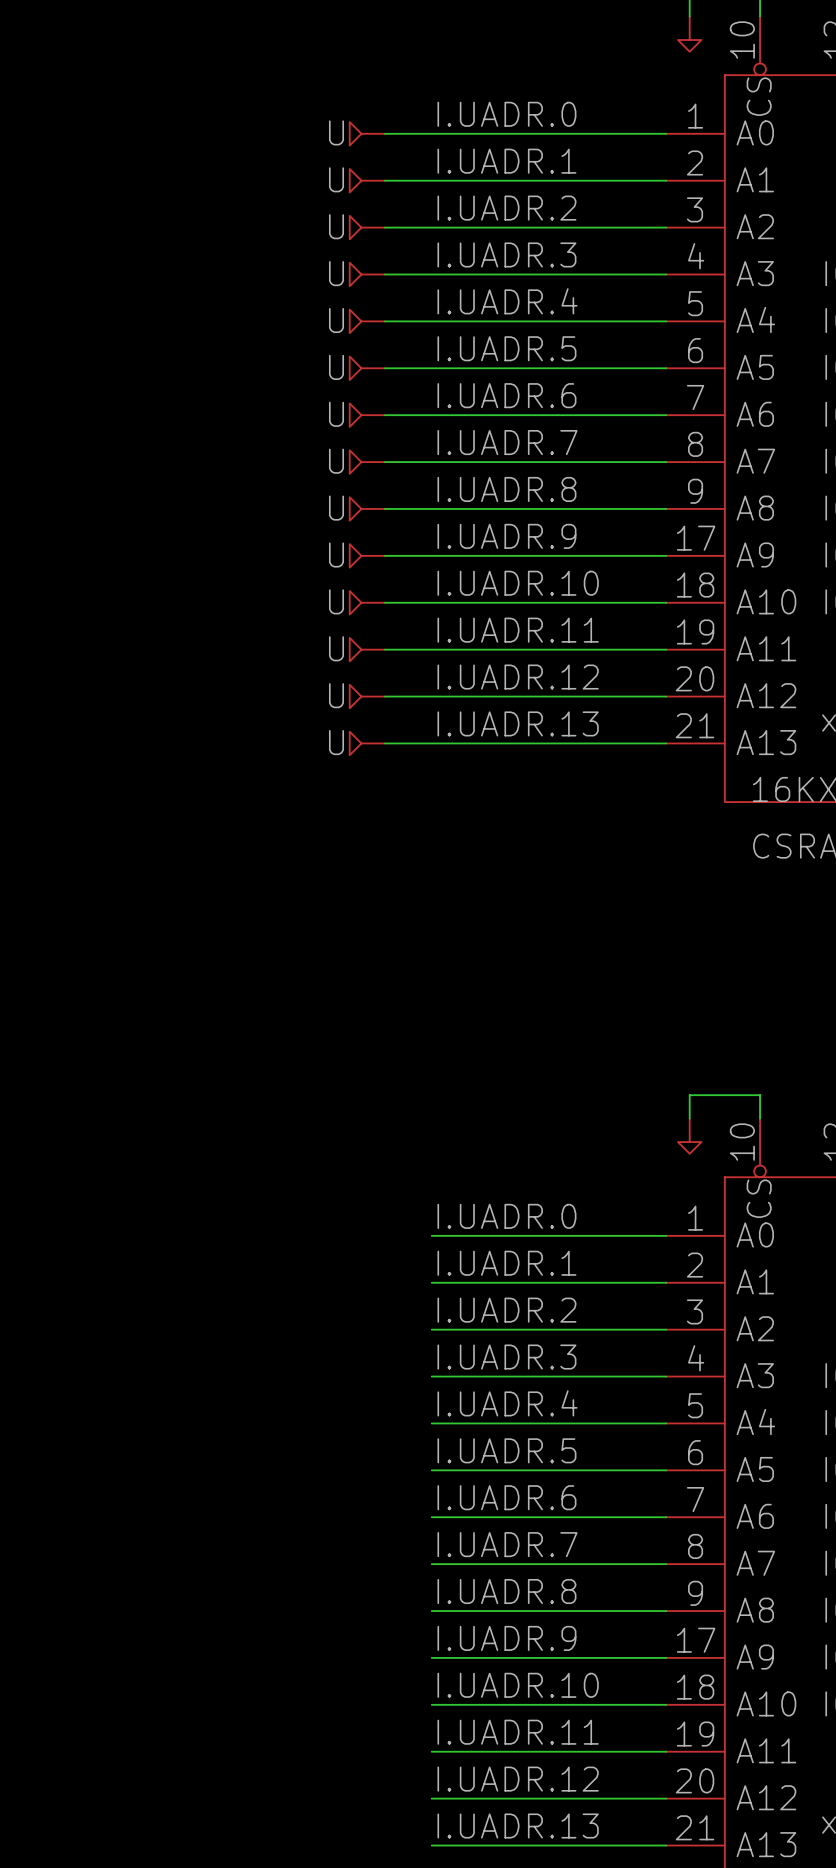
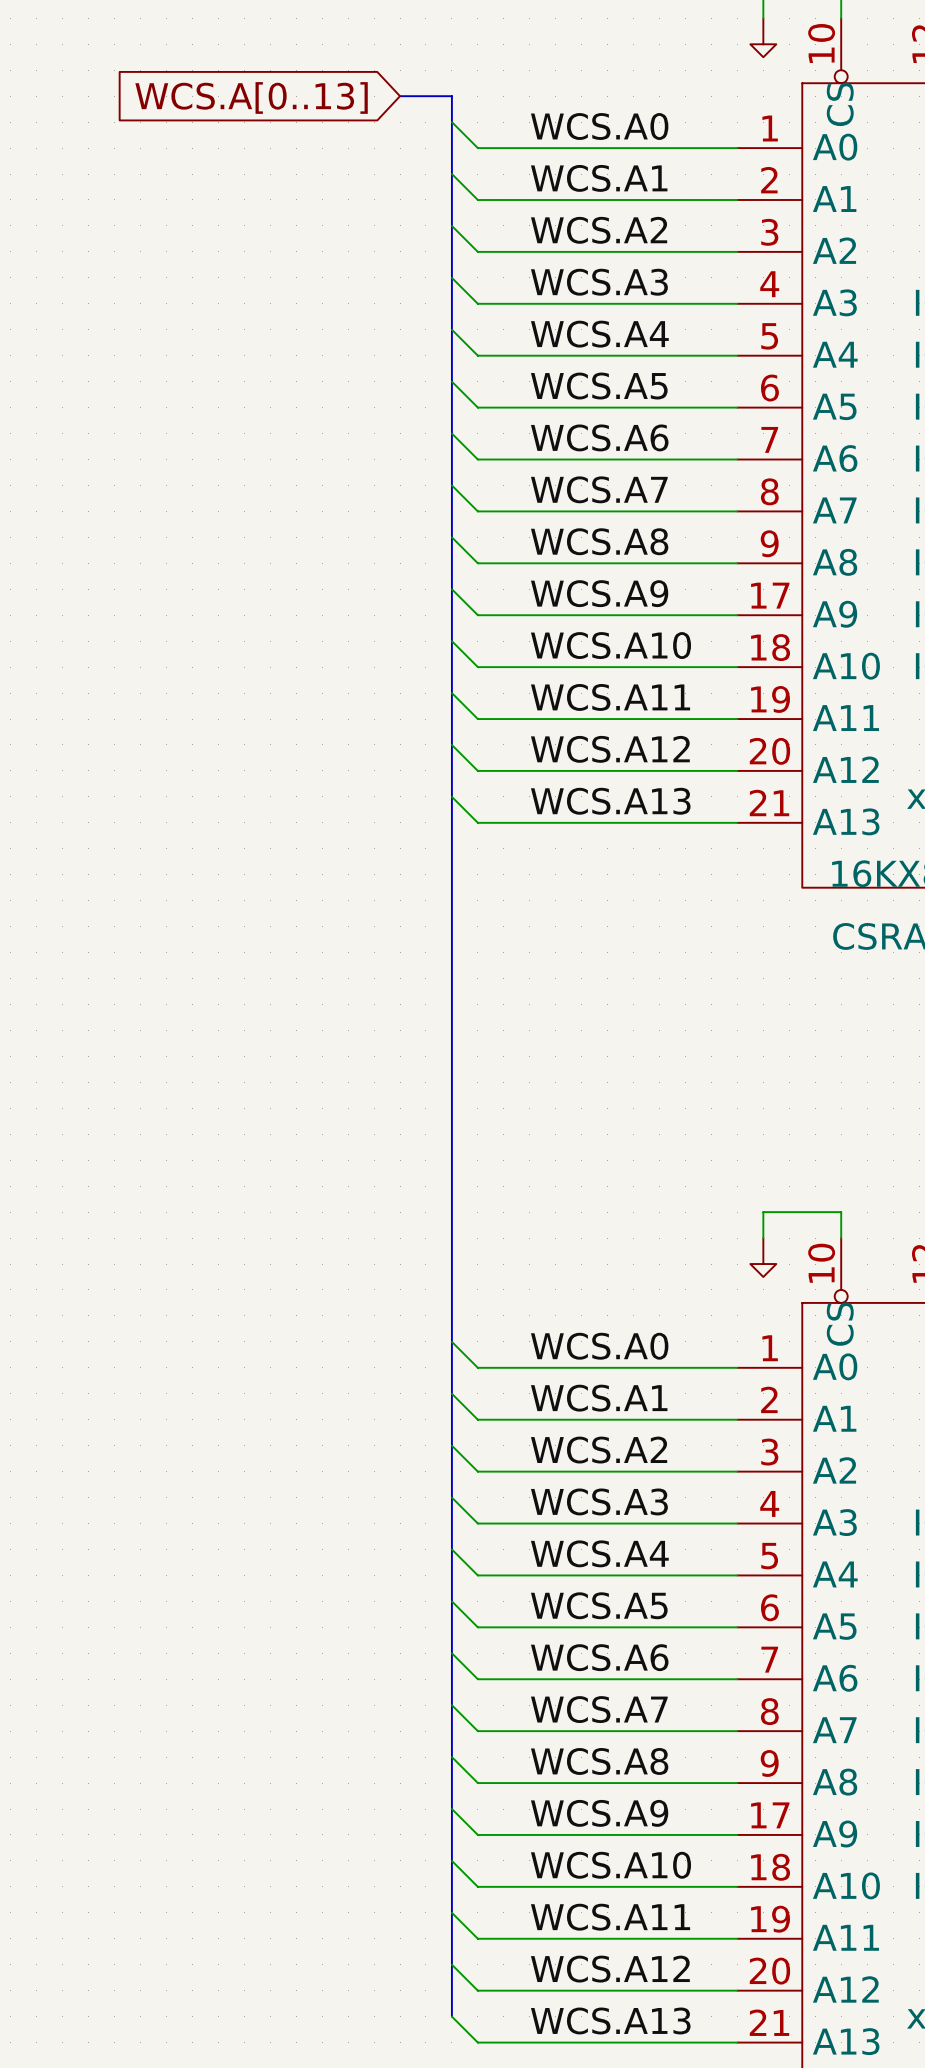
bus: none -> (400, 96) (451, 96) (451, 2016)
global label: none -> WCS.A[0..13] (251, 97)
label: I.UADR.0 (506, 114) -> none
label: none -> WCS.A0 (599, 126)
U: (366, 133) -> none
wire: (384, 133) (431, 133) -> (451, 122) (477, 148)
label: I.UADR.1 (506, 161) -> none
label: none -> WCS.A1 (599, 178)
U: (366, 180) -> none
wire: (384, 180) (431, 180) -> (451, 174) (477, 199)
label: I.UADR.2 (506, 208) -> none
label: none -> WCS.A2 (599, 230)
U: (366, 227) -> none
wire: (384, 227) (431, 227) -> (451, 225) (477, 251)
label: I.UADR.3 (506, 254) -> none
label: none -> WCS.A3 (599, 282)
U: (366, 274) -> none
wire: (384, 274) (431, 274) -> (451, 277) (477, 303)
label: I.UADR.4 (507, 301) -> none
label: none -> WCS.A4 (599, 334)
U: (366, 321) -> none
wire: (384, 321) (431, 321) -> (451, 329) (477, 355)
label: I.UADR.5 (506, 348) -> none
label: none -> WCS.A5 (599, 386)
U: (366, 368) -> none
wire: (384, 368) (431, 368) -> (451, 381) (477, 407)
label: I.UADR.6 (506, 395) -> none
label: none -> WCS.A6 (599, 437)
U: (366, 415) -> none
wire: (384, 415) (431, 415) -> (451, 433) (477, 459)
label: I.UADR.7 (507, 442) -> none
label: none -> WCS.A7 (599, 489)
U: (366, 462) -> none
wire: (384, 462) (431, 462) -> (451, 485) (477, 511)
label: I.UADR.8 (506, 489) -> none
label: none -> WCS.A8 (599, 541)
U: (366, 508) -> none
wire: (384, 508) (431, 508) -> (451, 537) (477, 563)
label: I.UADR.9 (506, 536) -> none
label: none -> WCS.A9 (599, 593)
U: (366, 555) -> none
wire: (384, 555) (431, 555) -> (451, 589) (477, 615)
label: I.UADR.10 (518, 583) -> none
label: none -> WCS.A10 (610, 645)
U: (366, 602) -> none
wire: (384, 602) (431, 602) -> (451, 641) (477, 667)
label: I.UADR.11 (518, 630) -> none
label: none -> WCS.A11 (610, 697)
U: (366, 649) -> none
wire: (384, 649) (431, 649) -> (451, 693) (477, 719)
label: I.UADR.12 (518, 677) -> none
label: none -> WCS.A12 (610, 749)
U: (366, 696) -> none
wire: (384, 696) (431, 696) -> (451, 744) (477, 770)
label: I.UADR.13 (518, 723) -> none
label: none -> WCS.A13 (610, 801)
U: (366, 743) -> none
wire: (384, 743) (431, 743) -> (451, 796) (477, 822)
wire: none -> (451, 1341) (477, 1367)
label: I.UADR.0 (506, 1216) -> none
label: none -> WCS.A0 (599, 1346)
wire: none -> (451, 1393) (477, 1419)
label: I.UADR.1 (506, 1263) -> none
label: none -> WCS.A1 (599, 1398)
wire: none -> (451, 1445) (477, 1471)
label: I.UADR.2 (506, 1310) -> none
label: none -> WCS.A2 (599, 1450)
wire: none -> (451, 1497) (477, 1523)
label: I.UADR.3 (506, 1357) -> none
label: none -> WCS.A3 (599, 1501)
wire: none -> (451, 1549) (477, 1575)
label: I.UADR.4 (507, 1403) -> none
label: none -> WCS.A4 (599, 1553)
wire: none -> (451, 1601) (477, 1627)
label: I.UADR.5 (506, 1450) -> none
label: none -> WCS.A5 (599, 1605)
wire: none -> (451, 1653) (477, 1679)
label: I.UADR.6 (506, 1497) -> none
label: none -> WCS.A6 (599, 1657)
wire: none -> (451, 1705) (477, 1731)
label: I.UADR.7 (507, 1544) -> none
label: none -> WCS.A7 (599, 1709)
wire: none -> (451, 1757) (477, 1783)
label: I.UADR.8 (506, 1591) -> none
label: none -> WCS.A8 (599, 1761)
wire: none -> (451, 1809) (477, 1834)
label: I.UADR.9 (506, 1638) -> none
label: none -> WCS.A9 (599, 1813)
wire: none -> (451, 1860) (477, 1886)
label: I.UADR.10 (518, 1685) -> none
label: none -> WCS.A10 (610, 1865)
wire: none -> (451, 1912) (477, 1938)
label: I.UADR.11 (518, 1732) -> none
label: none -> WCS.A11 (610, 1917)
wire: none -> (451, 1964) (477, 1990)
label: I.UADR.12 (518, 1779) -> none
label: none -> WCS.A12 (610, 1969)
wire: none -> (451, 2016) (477, 2042)
label: I.UADR.13 (518, 1825) -> none
label: none -> WCS.A13 (610, 2020)

